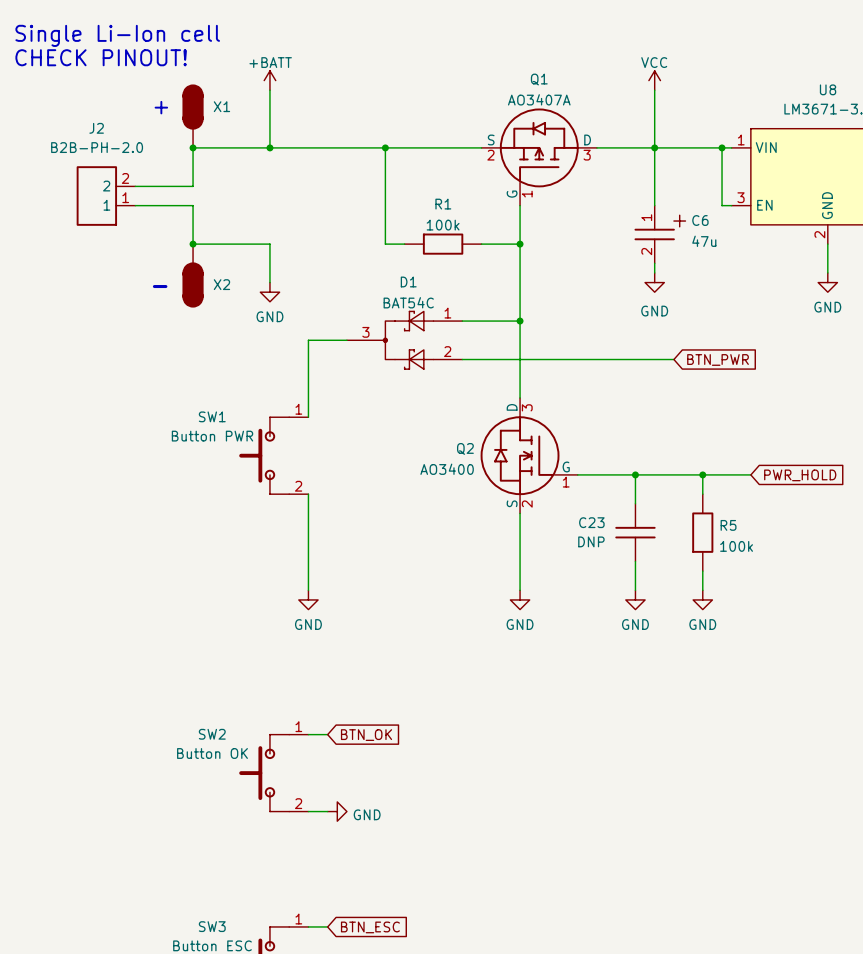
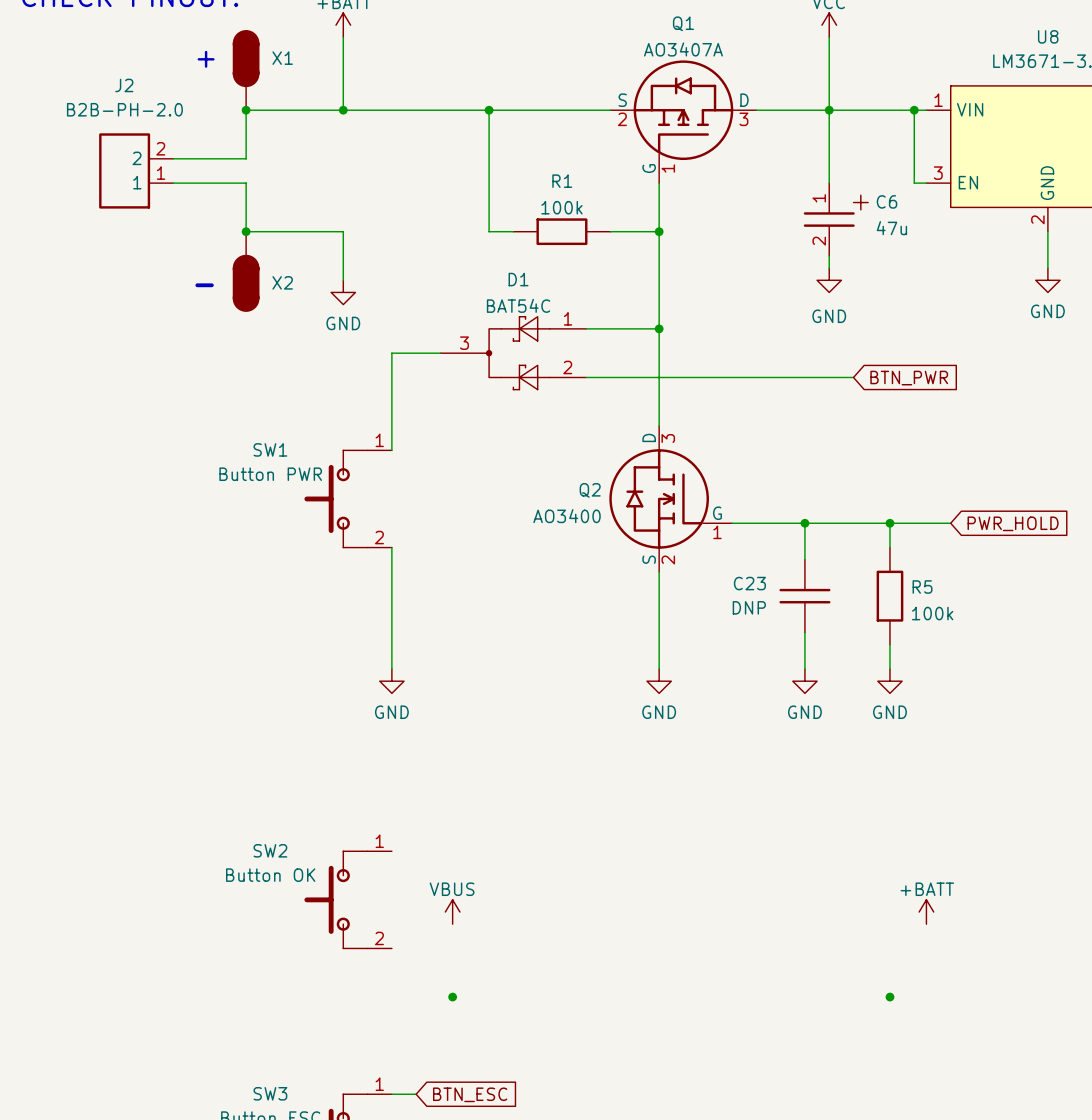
wire: (308, 734) (327, 734) -> none
global label: BTN_OK (366, 735) -> none
power symbol: none -> VBUS (452, 912)
power symbol: none -> +BATT (926, 912)
wire: (308, 811) (327, 811) -> none
power symbol: GND (337, 811) -> none
junction: none -> (452, 997)
junction: none -> (889, 997)

